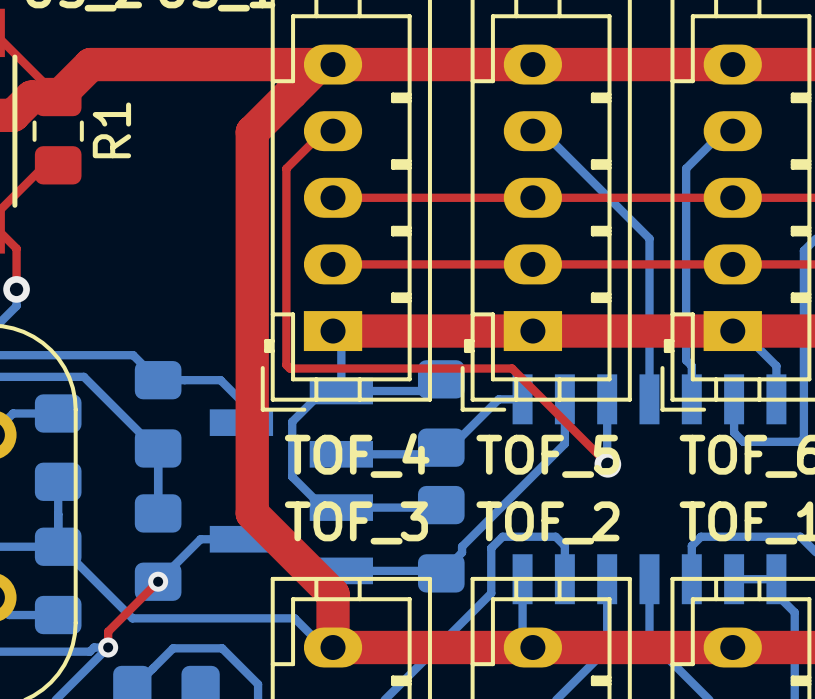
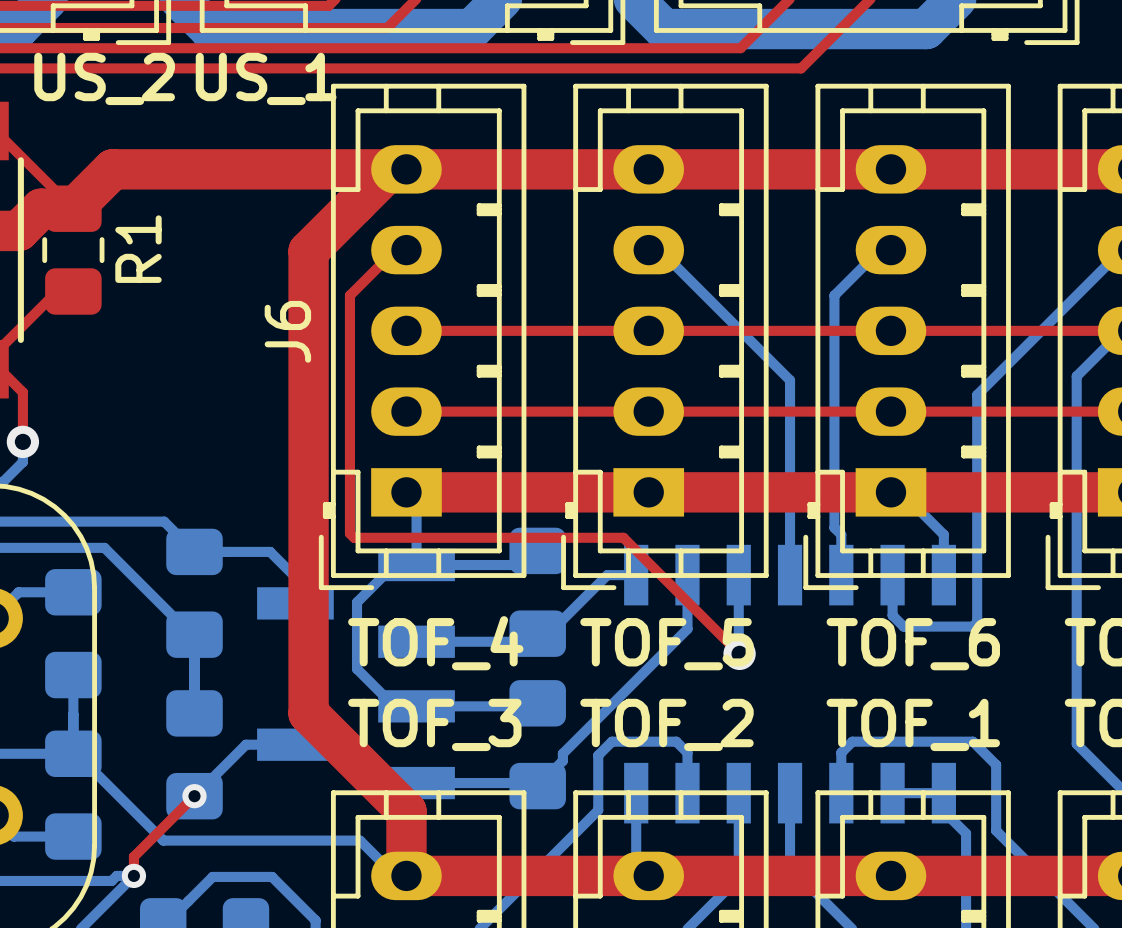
J6 name: none -> J6 (287, 331)

